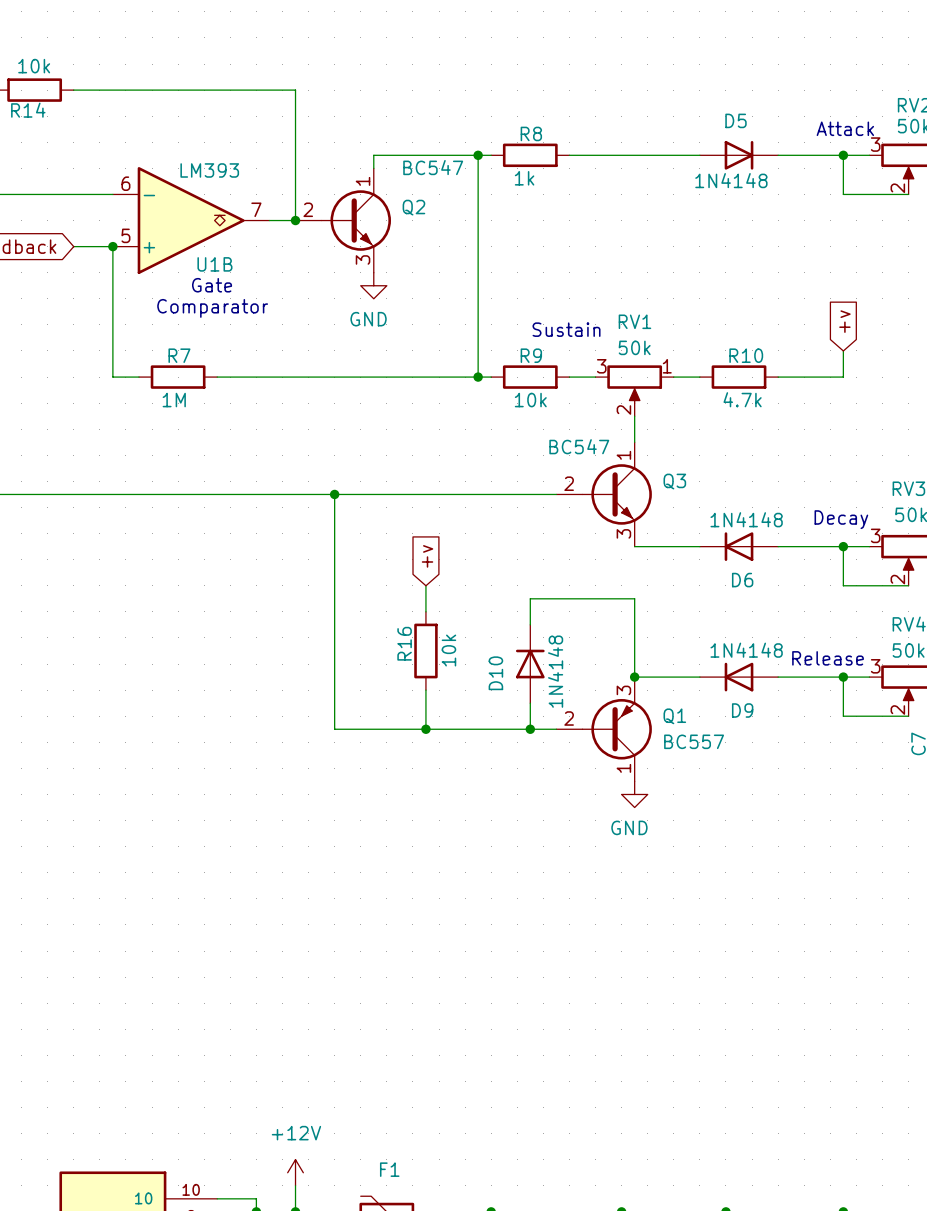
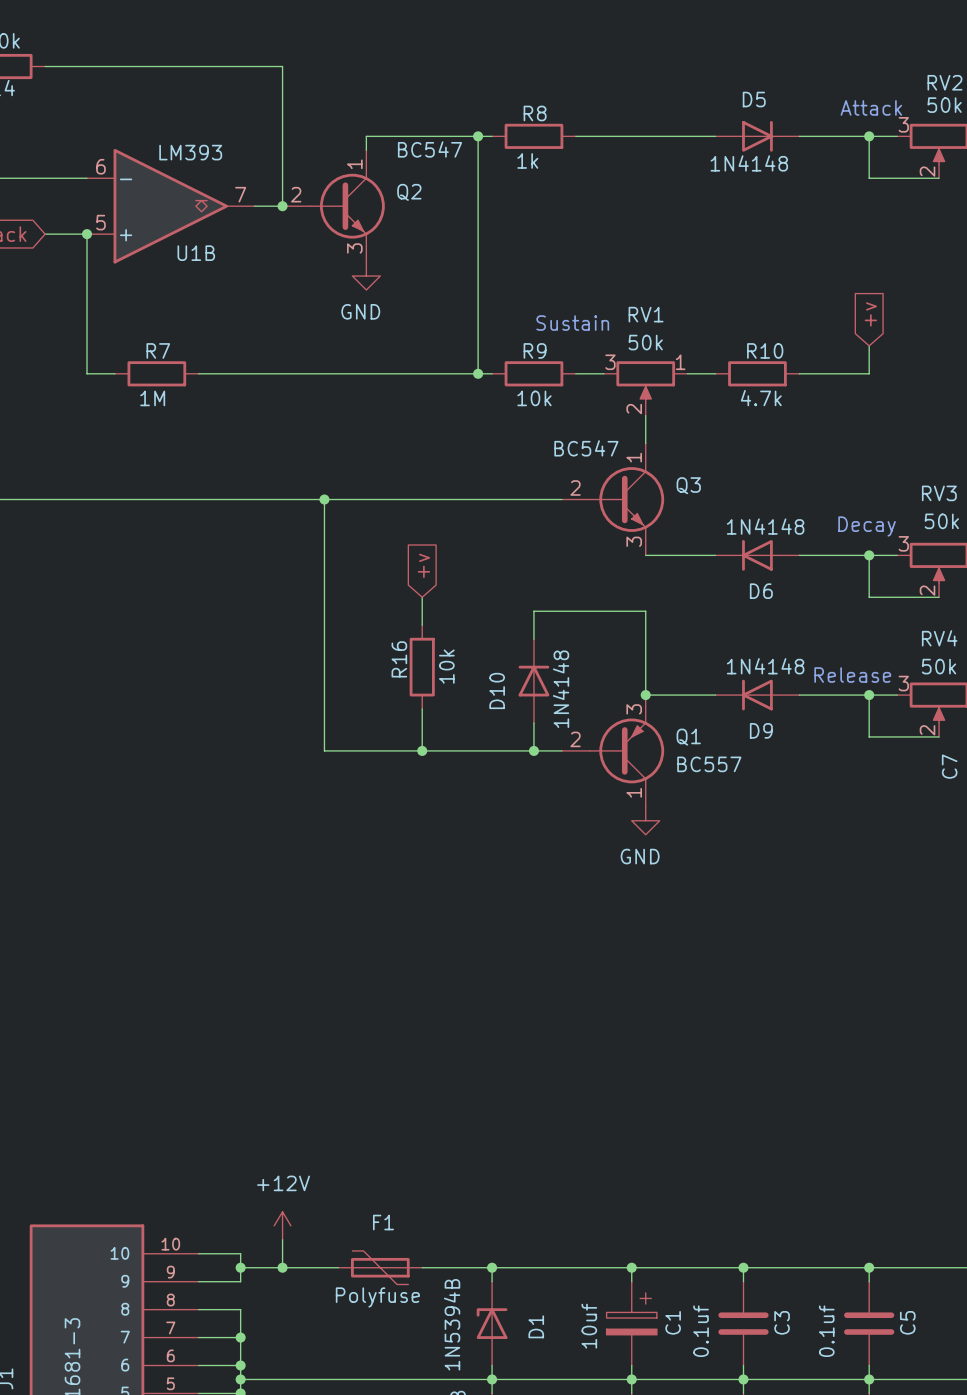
text: Gate (212, 285) -> none
text: Comparator (212, 308) -> none

